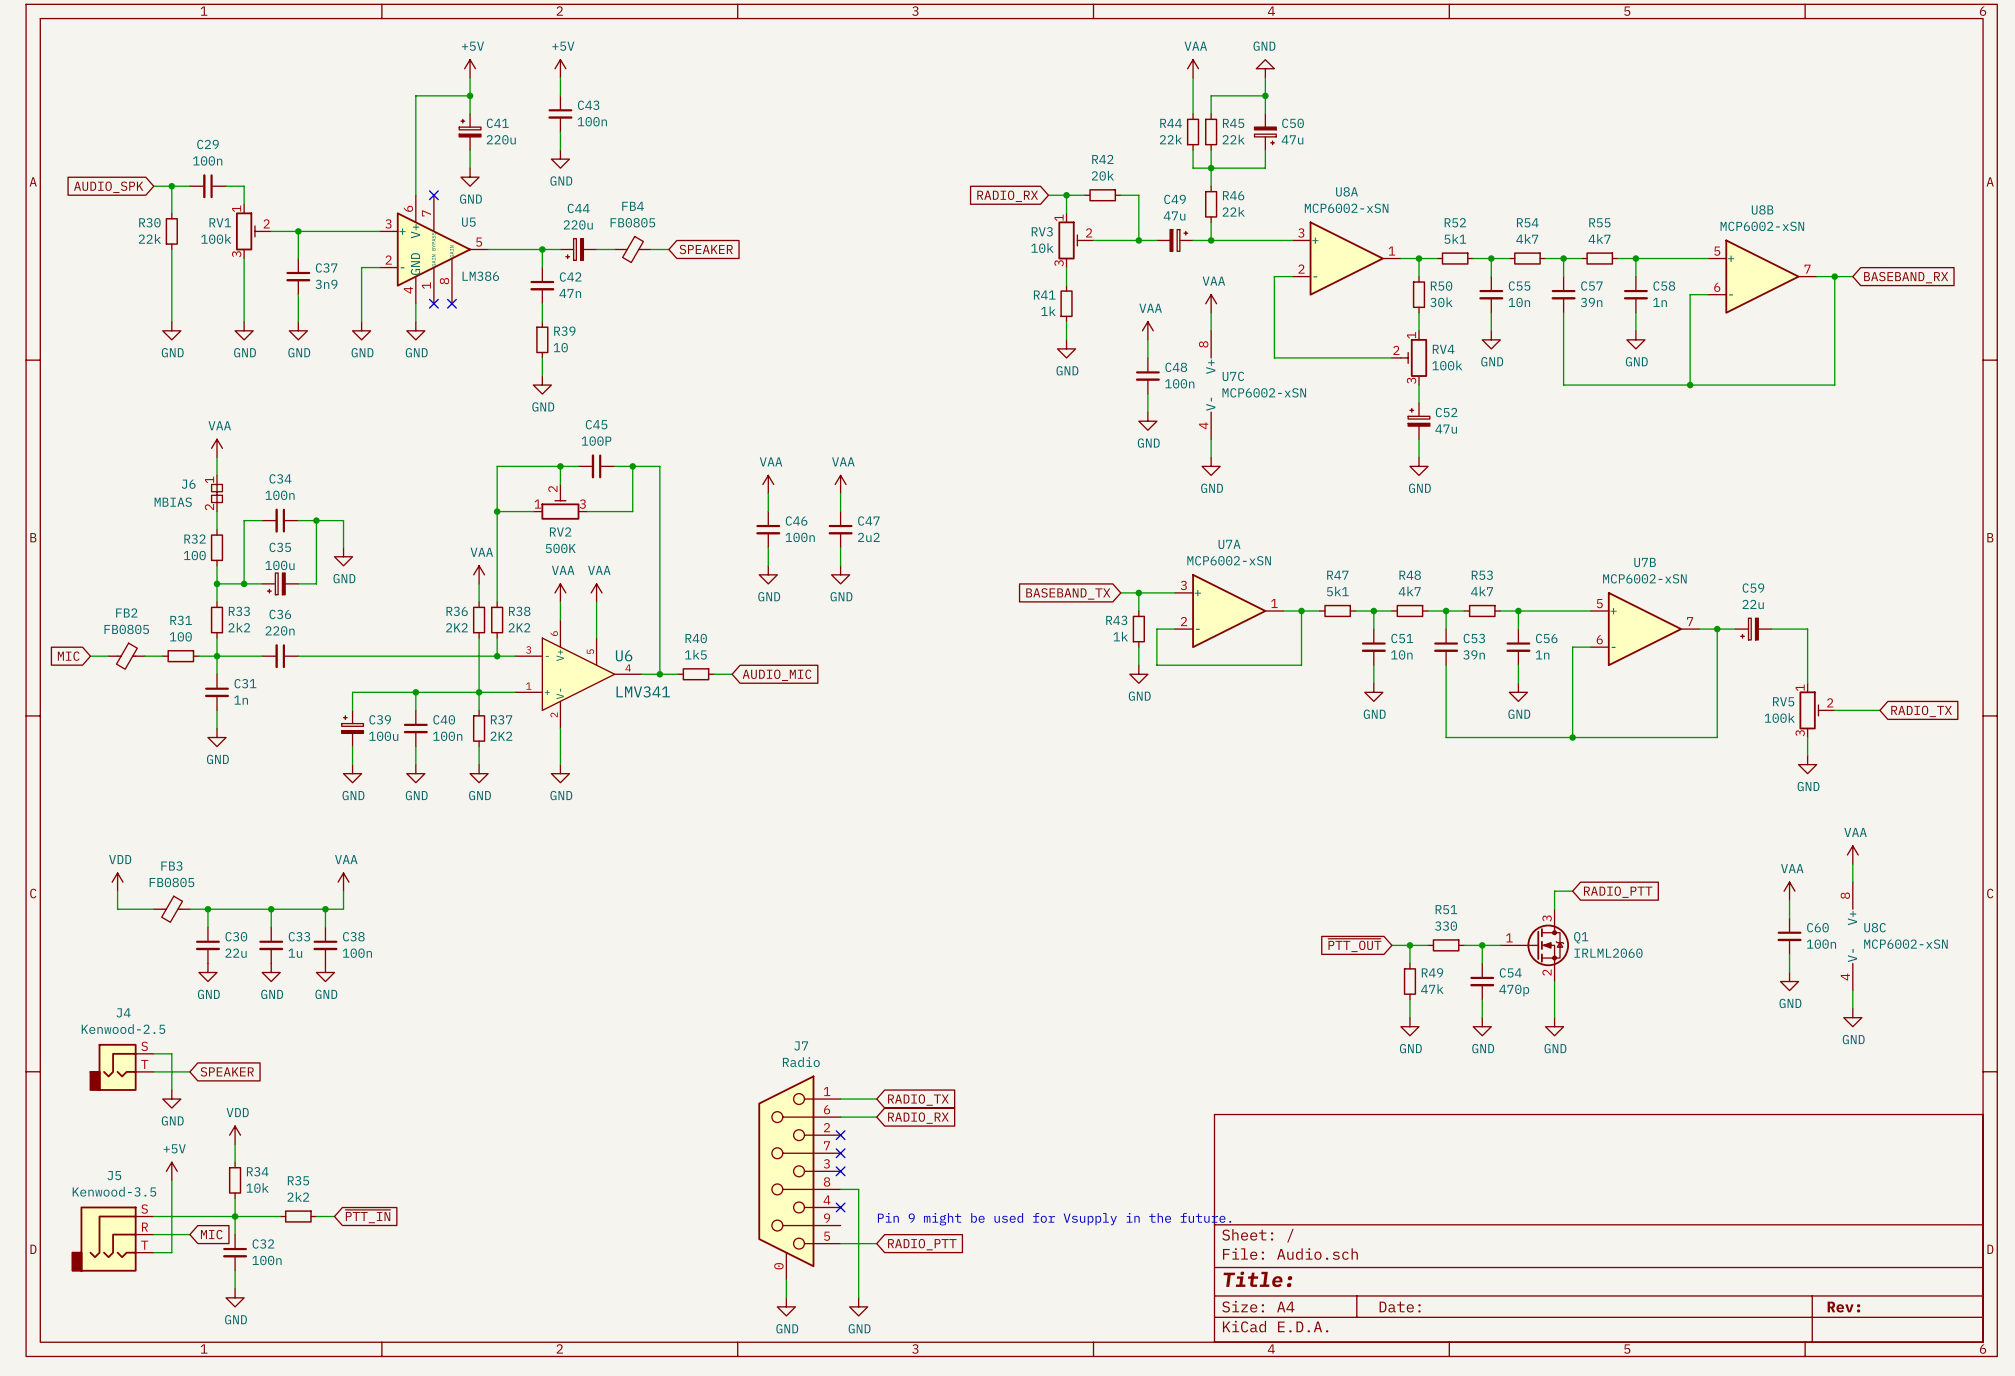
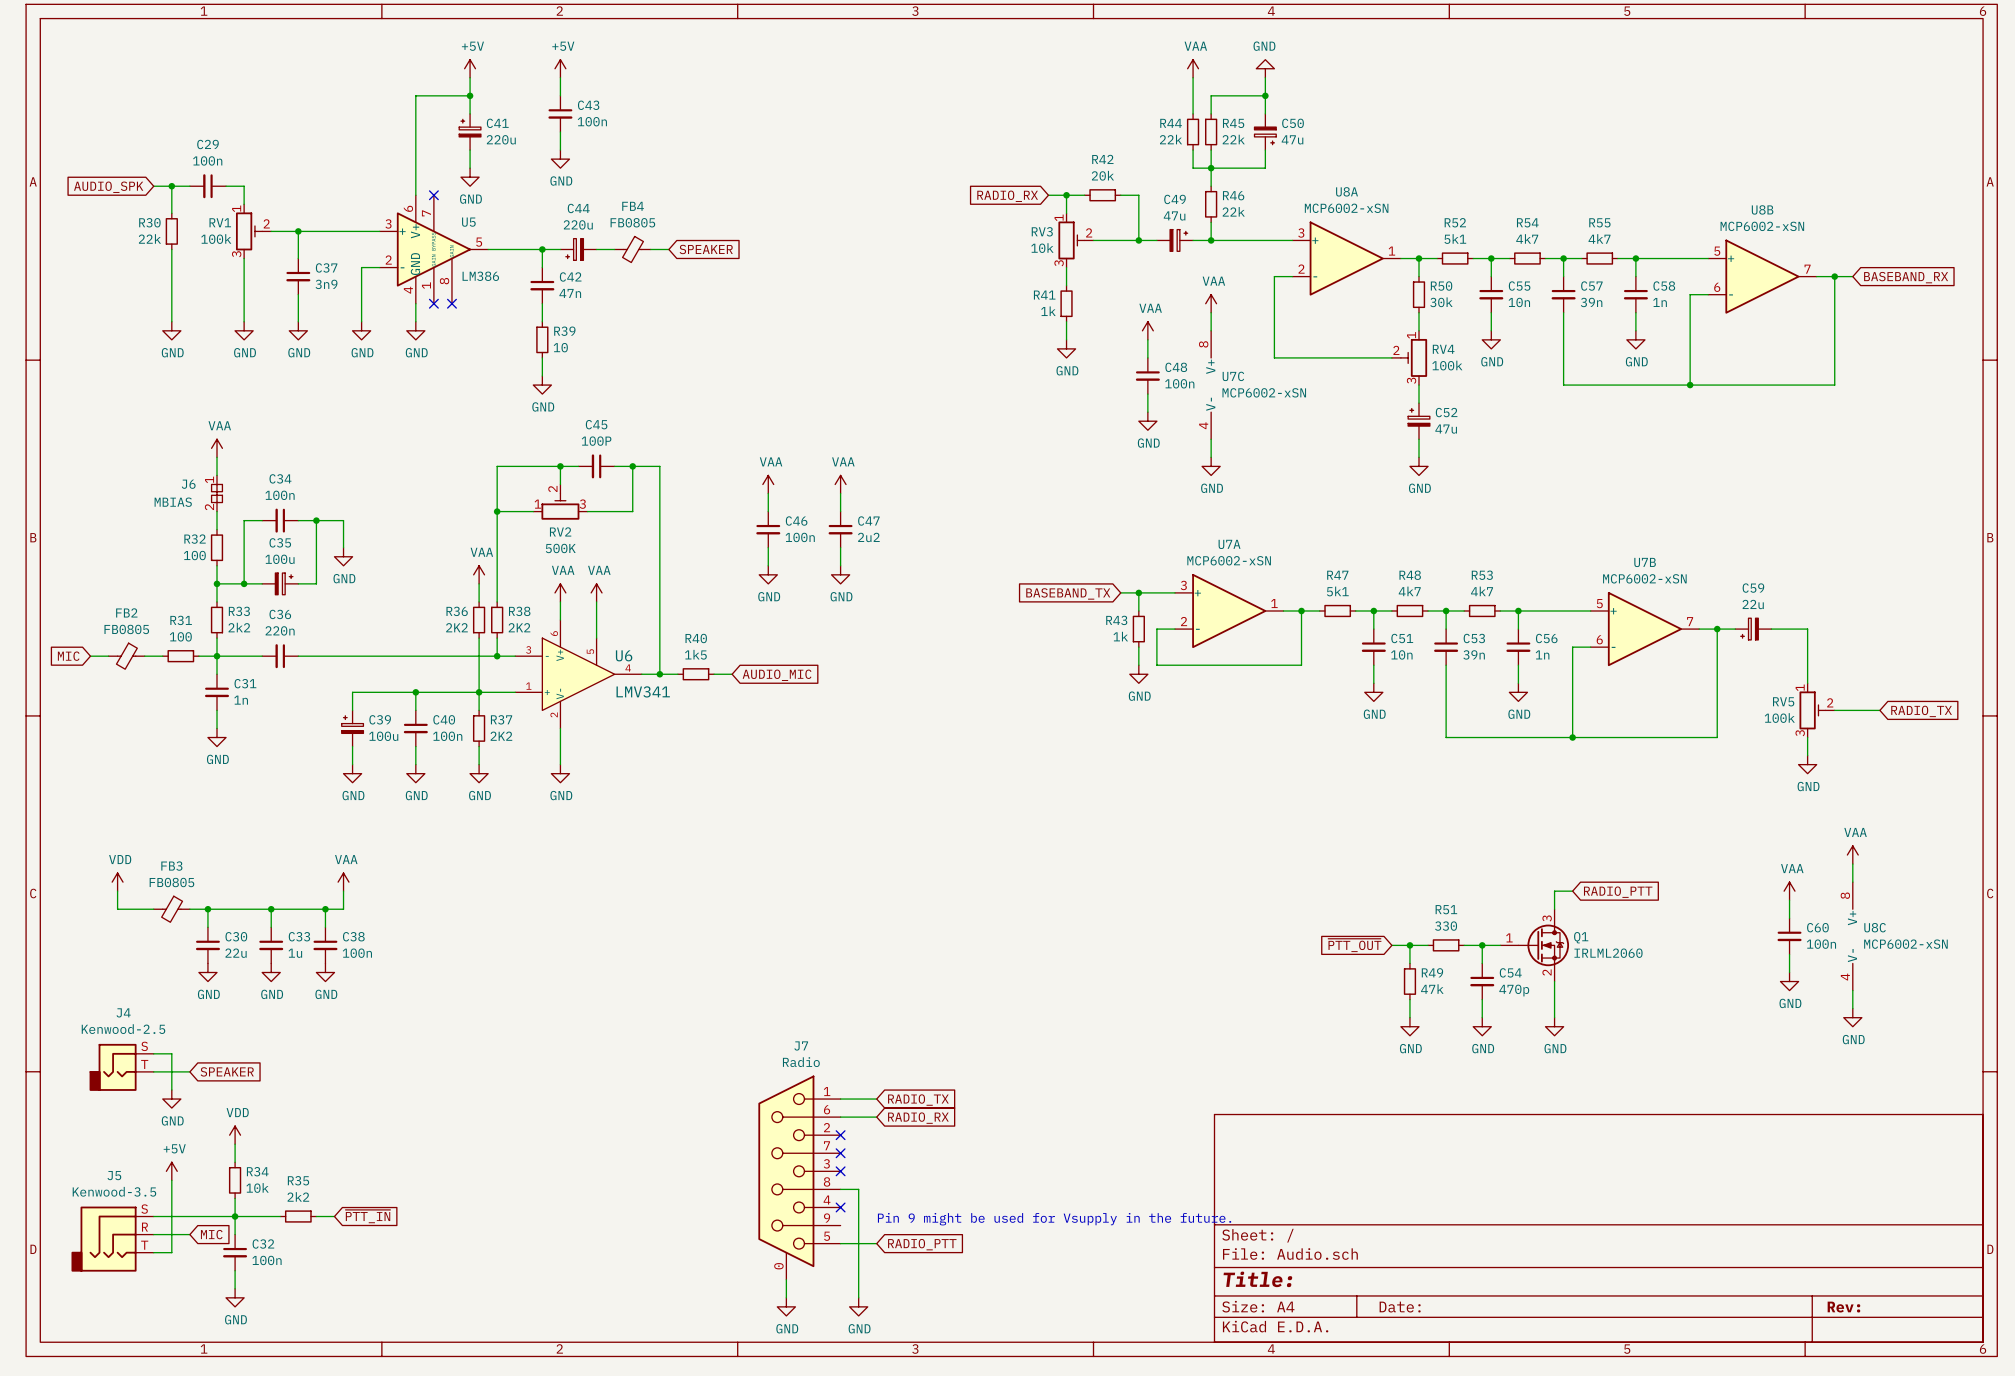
C35 rotation: 0° (276, 583) -> 180° (284, 583)

